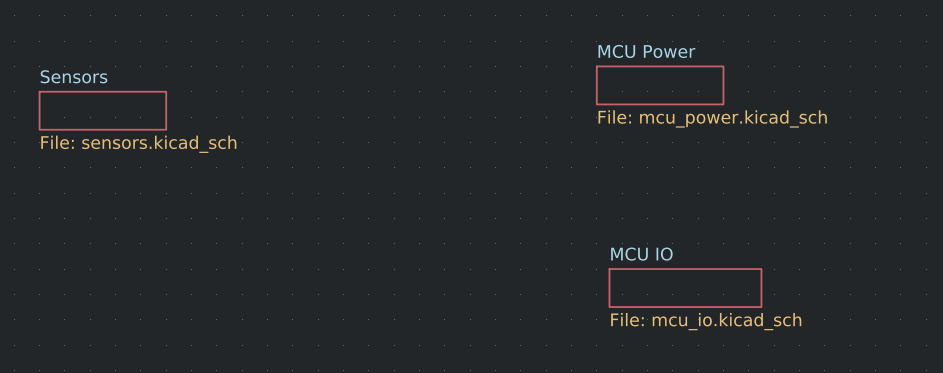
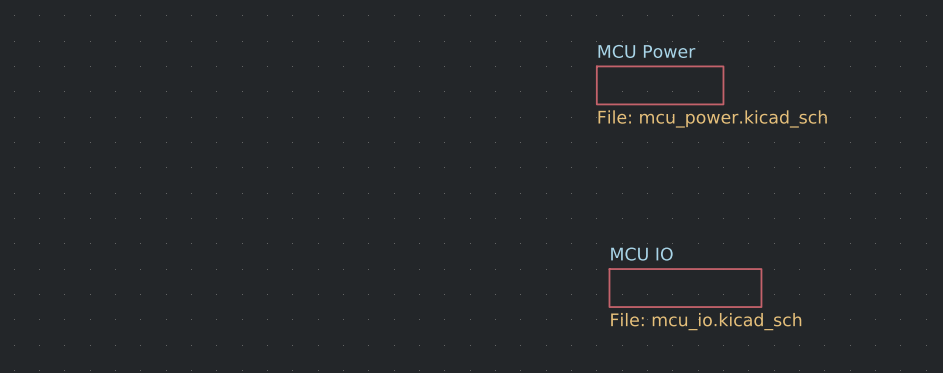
sheet Sensors: File: sensors.kicad_sch (102, 110) -> none

